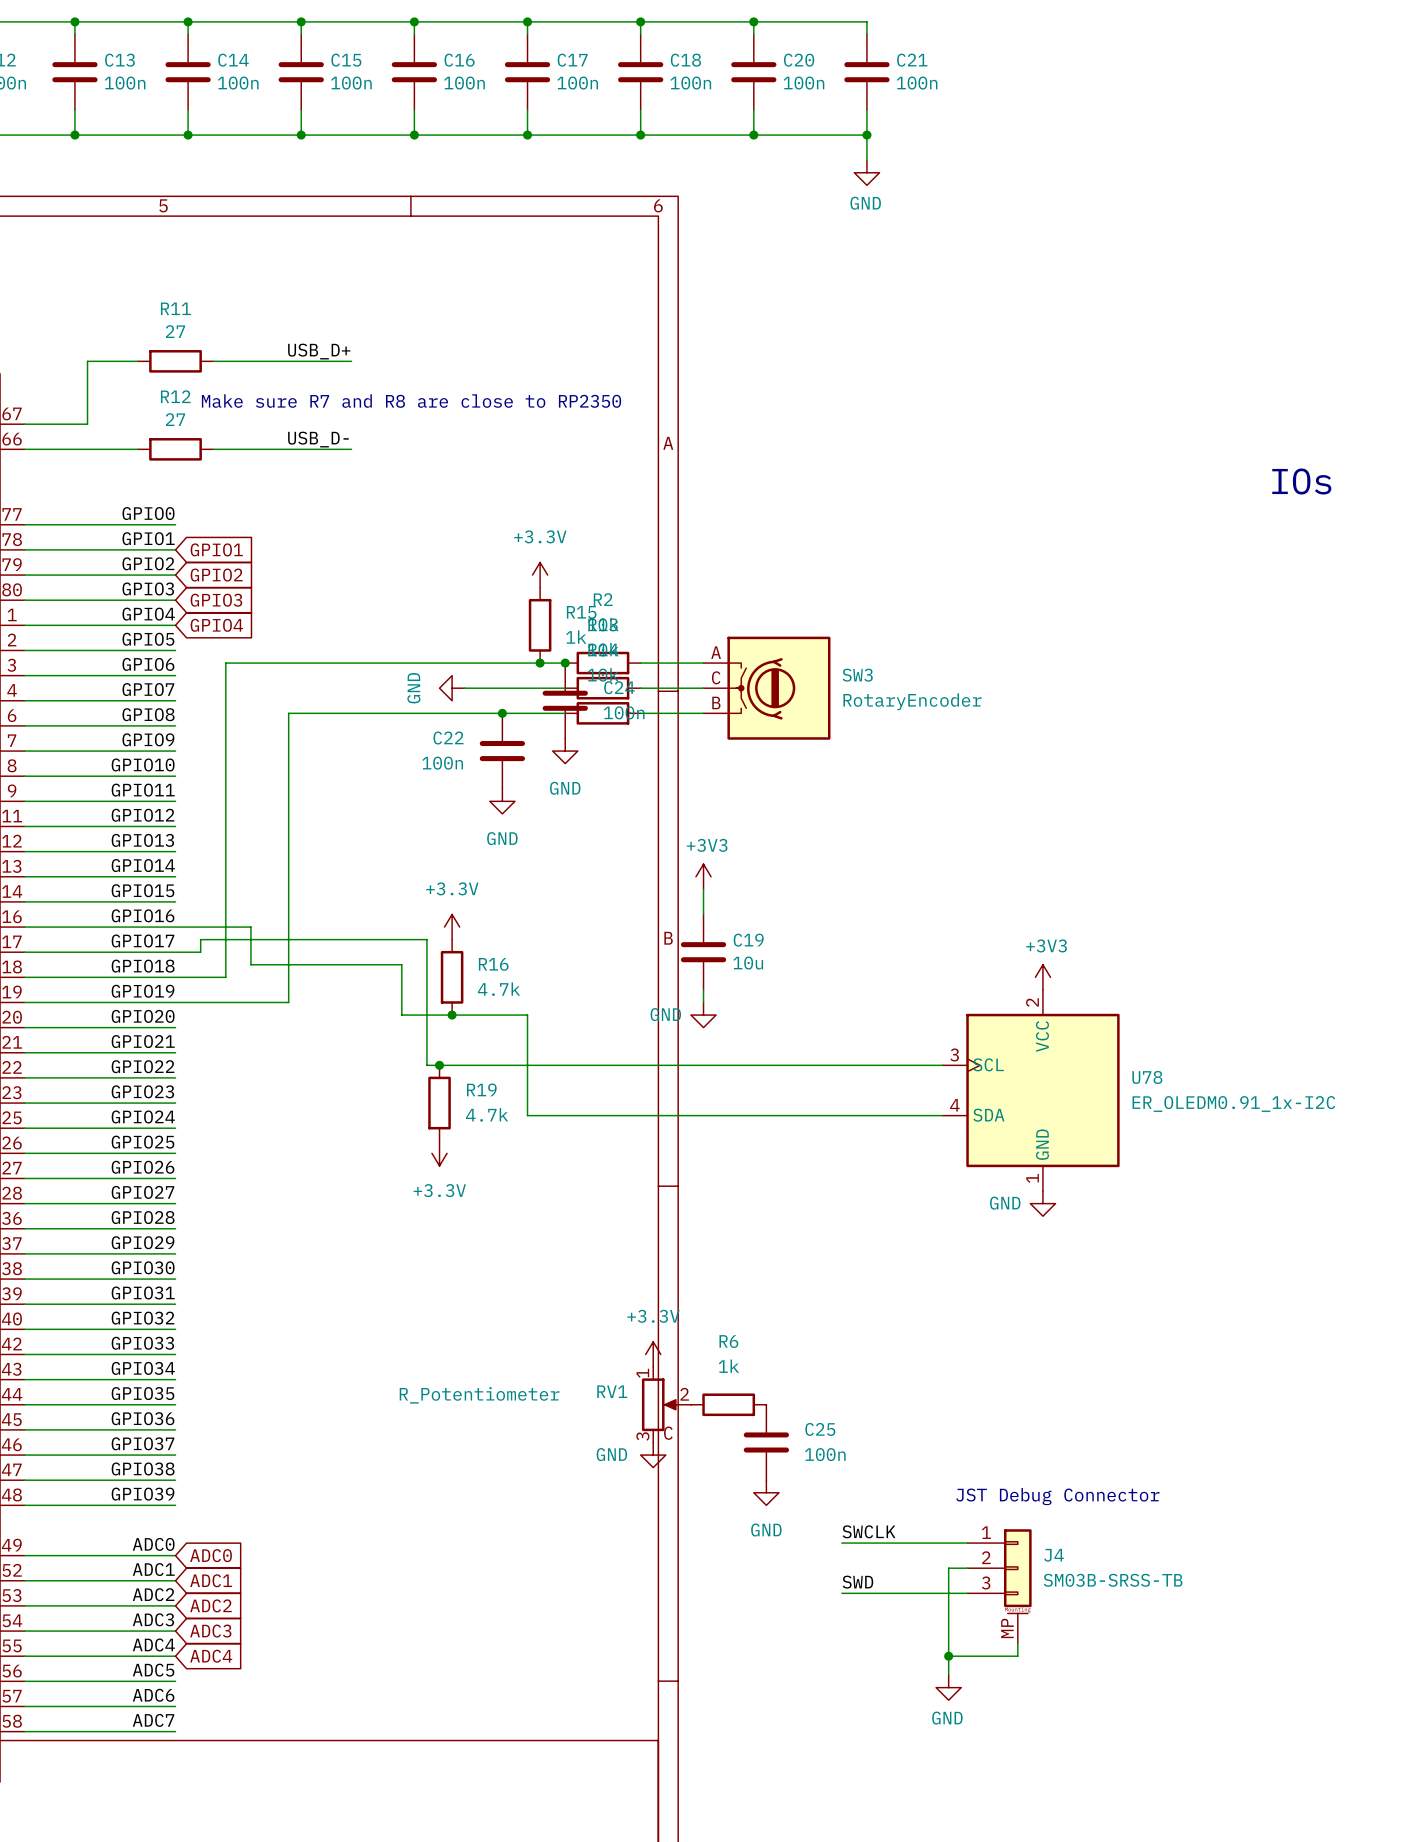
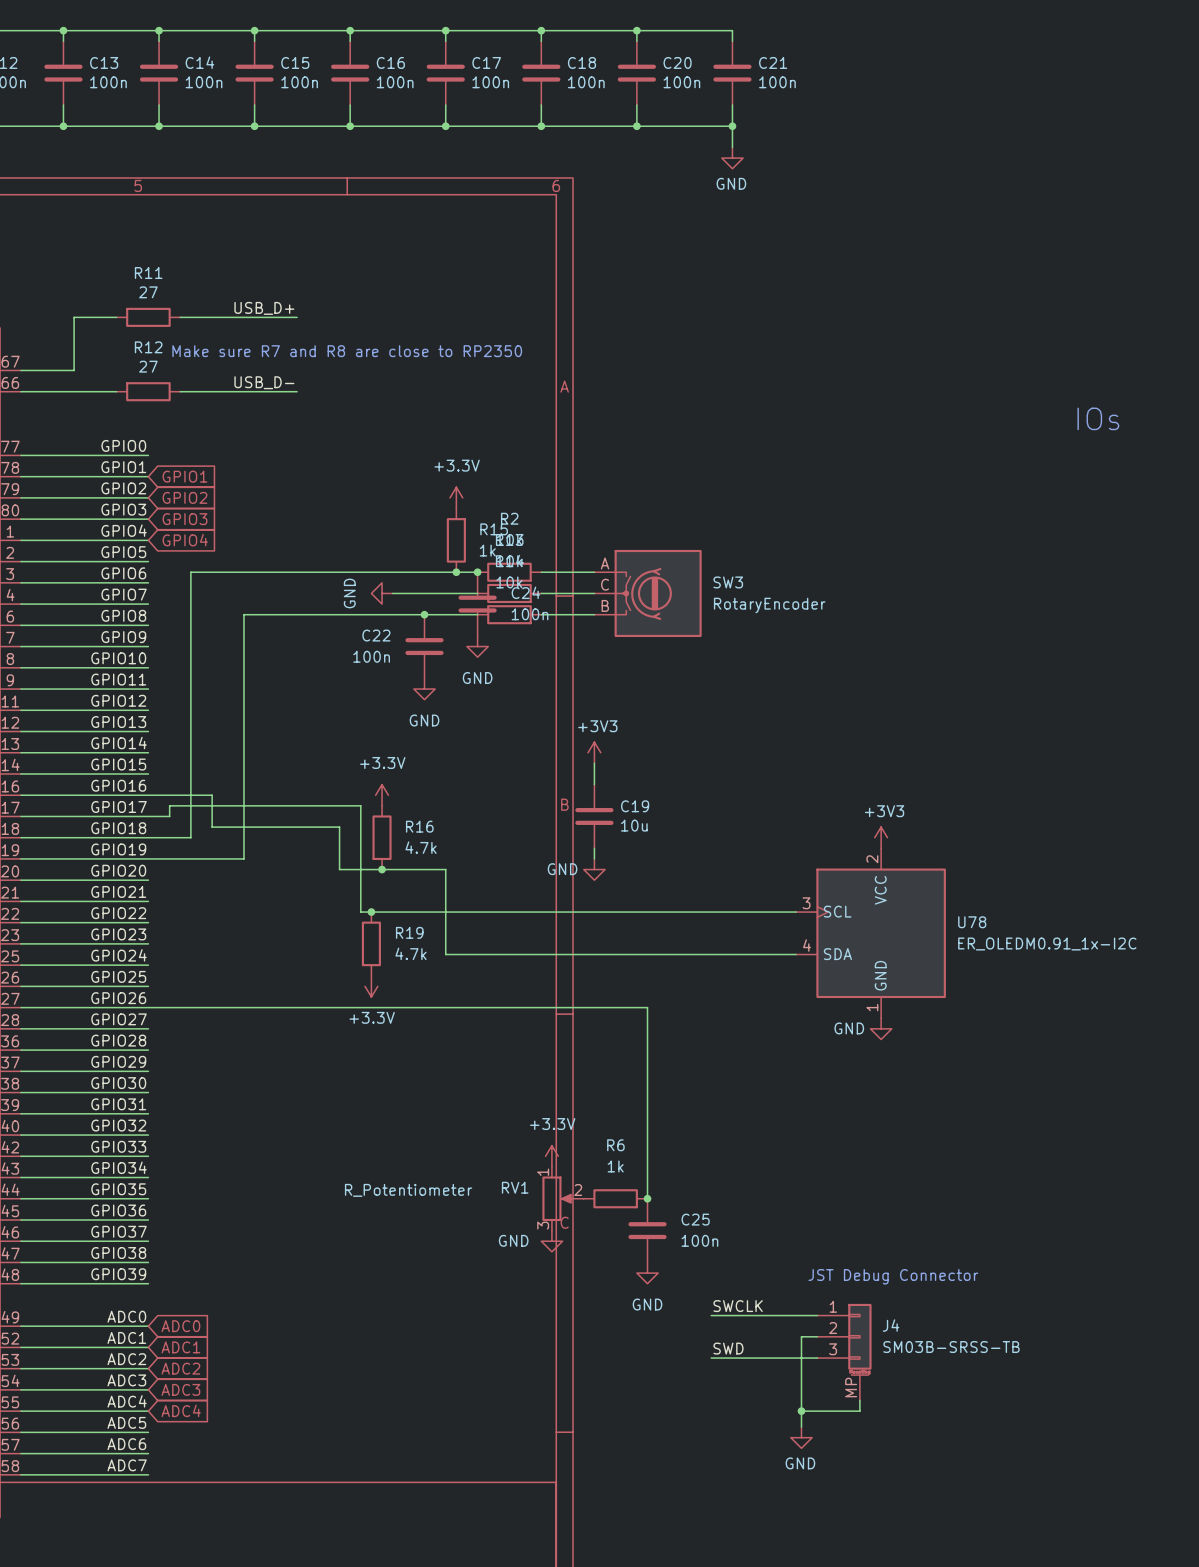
wire: none -> (148, 1007) (647, 1007) (647, 1198)
junction: none -> (647, 1198)

